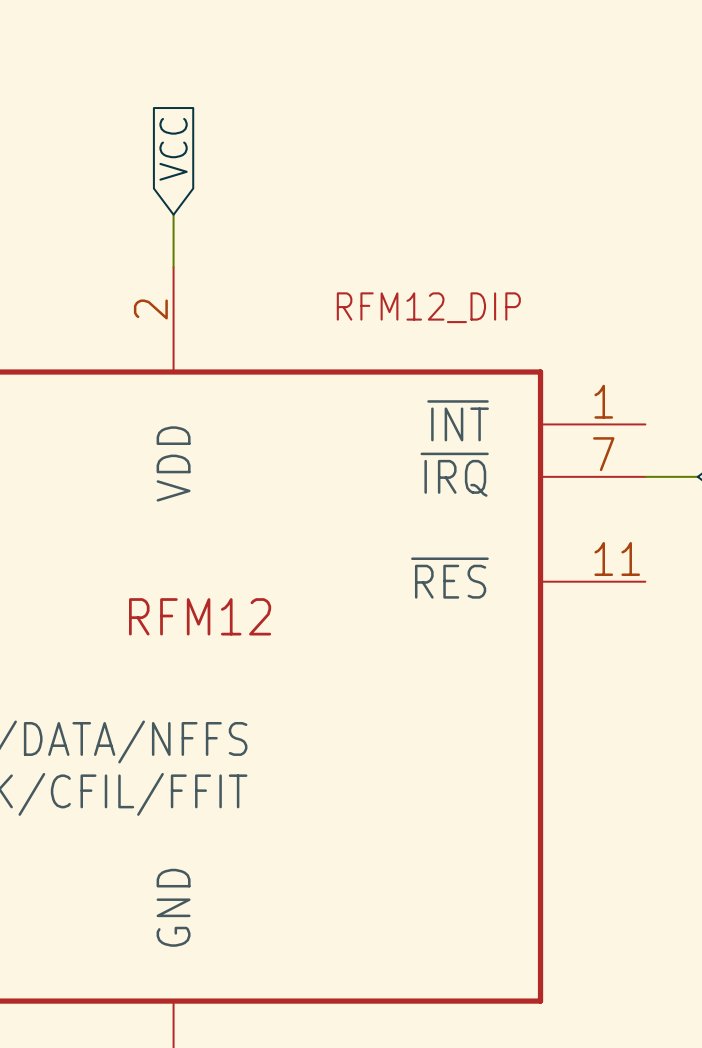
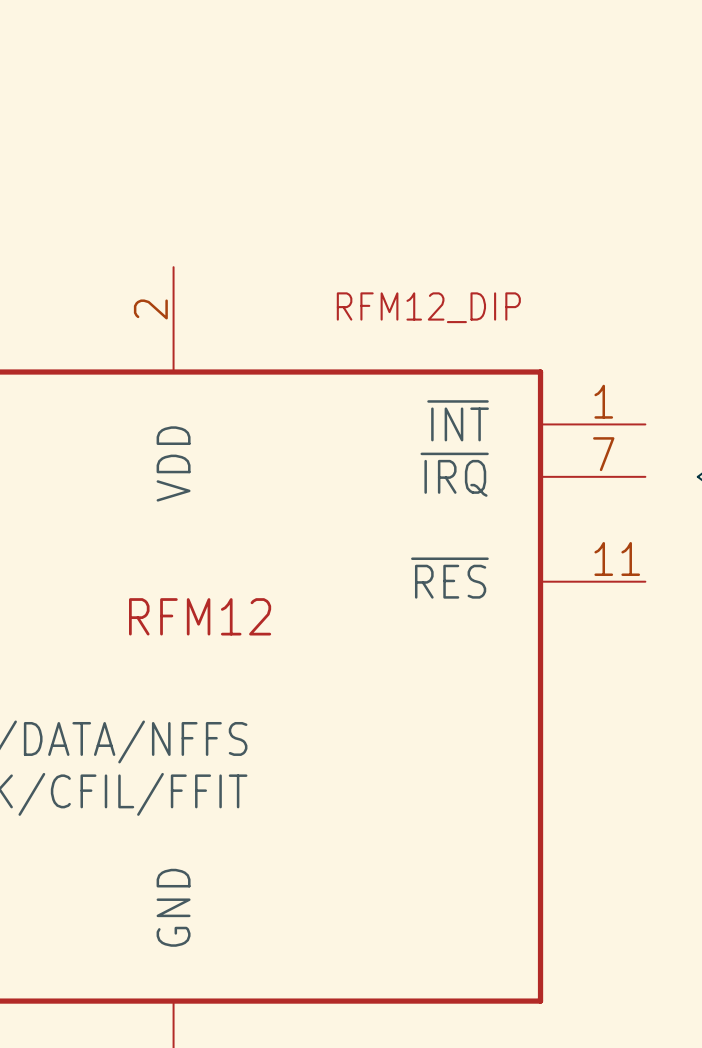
global label: VCC (173, 149) -> none
wire: (173, 214) (173, 267) -> none
wire: (645, 476) (697, 476) -> none

